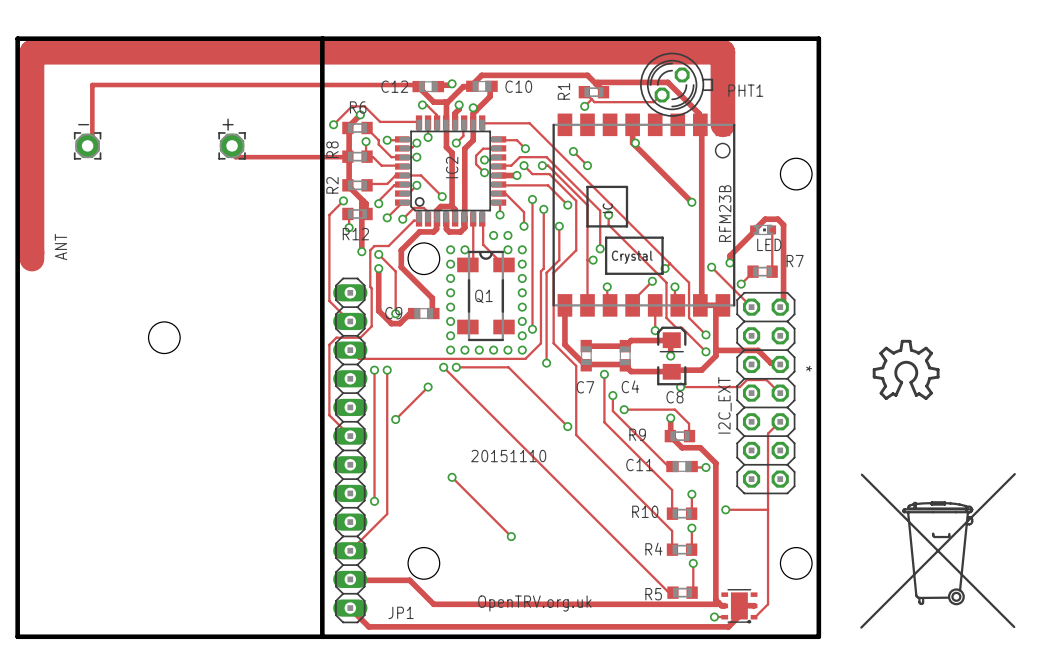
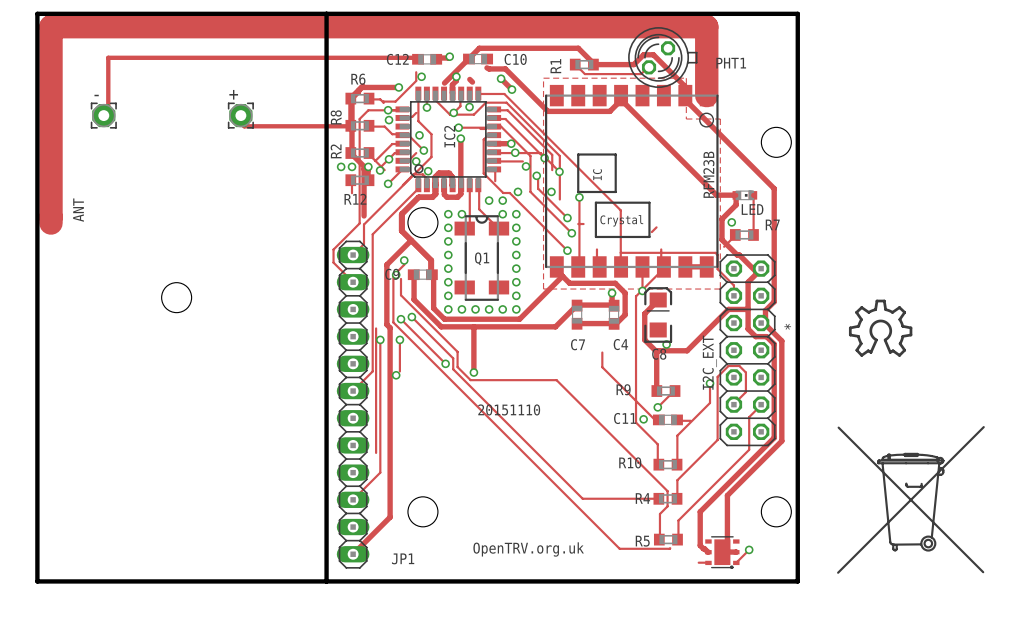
track: (595, 83) (667, 82) (698, 113) (698, 123) (701, 126) (700, 305) -> none
track: (418, 86) (433, 102) (446, 103) -> none
track: (491, 86) (490, 96) (473, 113) (473, 140) (464, 148) (463, 228) -> (460, 138) (460, 194)
track: (603, 92) (587, 75) (481, 75) (472, 86) (463, 86) (446, 103) -> none
track: (591, 99) (584, 106) -> none
track: (446, 103) (446, 147) (452, 152) (452, 206) (454, 209) (455, 219) -> (562, 276) (519, 319) (444, 319) (433, 308) (431, 260) (402, 231) (402, 213) (418, 197) (432, 197) (435, 194) (435, 176) (439, 173) (448, 173) (452, 176) (452, 185)
track: (422, 104) (426, 104) (436, 114) (437, 122) -> (559, 199) (559, 156) (506, 102) (485, 102) (473, 114) (449, 114) (435, 100) (435, 93)
zone outline: none -> (543, 78) (543, 289) (720, 289) (720, 119) (686, 119) (686, 78) (543, 78)
via: (584, 106) -> none
via: (473, 107) -> none
track: none -> (501, 78) (511, 89)
via: none -> (501, 78)
track: none -> (444, 83) (479, 48) (578, 48) (593, 64) (633, 64) (643, 54) (653, 54) (684, 86) (687, 101) (774, 188) (774, 301) (765, 310) (765, 321) (761, 323) (764, 323) (781, 340) (781, 441) (727, 495) (727, 549) (722, 552) (736, 552)
via: (360, 114) -> none
track: none -> (398, 87) (361, 87) (350, 98) (350, 125)
via: none -> (398, 87)
via: none -> (511, 89)
track: (419, 122) (380, 121) (364, 106) (351, 106) (333, 124) -> (418, 93) (418, 121) (431, 134) (431, 157) (364, 224) (364, 244) (353, 255)
track: (482, 122) (529, 123) (689, 282) (689, 317) (705, 334) -> (478, 93) (504, 93) (620, 210) (621, 266)
via: (333, 124) -> none
track: (632, 124) (632, 143) (691, 202) -> none
track: (367, 128) (378, 140) (378, 144) (391, 157) (416, 157) -> (369, 98) (380, 99) (383, 102) (395, 101) (416, 80) (416, 72)
via: none -> (469, 107)
track: (499, 139) (516, 140) (525, 148) -> (494, 109) (507, 110) (552, 154) (552, 170)
track: (366, 141) (367, 157) (373, 157) (381, 165) (402, 166) -> none
via: (366, 141) -> none
via: (416, 143) -> none
via: (635, 143) -> none
track: (499, 148) (483, 148) (476, 155) (476, 164) (484, 172) -> (494, 117) (505, 119) (544, 158)
via: (525, 148) -> none
via: none -> (389, 120)
track: (573, 151) (587, 165) -> none
via: (573, 151) -> none
track: none -> (369, 125) (384, 126) (392, 134) (408, 135) (423, 150)
via: (416, 157) -> none
track: none -> (458, 127) (501, 126) (530, 156) (530, 191) (571, 233)
via: none -> (458, 127)
via: (484, 159) -> none
track: (524, 165) (532, 174) (549, 174) (576, 200) (576, 250) (553, 272) (553, 343) (576, 365) (576, 435) (672, 530) (672, 549) -> (411, 317) (453, 358) (453, 369) (582, 498) (658, 498)
via: (524, 165) -> none
track: (542, 165) (548, 165) (587, 205) (587, 305) -> (579, 197) (578, 266)
via: (542, 165) -> none
via: (587, 165) -> none
via: none -> (419, 135)
track: none -> (488, 135) (483, 139) (483, 173) (503, 193) (509, 193) (567, 250)
track: (499, 166) (511, 165) (519, 157) (546, 157) (600, 210) (600, 248) -> none
via: none -> (460, 138)
via: (484, 172) -> none
track: none -> (402, 143) (392, 144) (375, 160)
via: none -> (423, 150)
track: (367, 185) (387, 183) (395, 175) (421, 175) (442, 196) -> (369, 153) (384, 170)
via: (416, 185) -> none
via: none -> (515, 152)
via: none -> (544, 158)
via: none -> (389, 159)
track: (499, 193) (505, 193) (524, 212) (524, 226) -> (494, 160) (522, 161)
via: none -> (416, 161)
via: (442, 196) -> none
via: none -> (341, 166)
via: none -> (352, 166)
via: none -> (368, 166)
track: (532, 199) (532, 329) -> none
track: (343, 200) (329, 215) (329, 301) (350, 321) -> (402, 109) (368, 110) (359, 119) (359, 223) (333, 249) (333, 262) (353, 282)
via: (343, 200) -> none
via: (691, 202) -> none
via: none -> (428, 171)
track: (543, 209) (543, 268) (540, 271) (540, 343) (525, 358) (359, 358) (350, 350) -> none
track: none -> (538, 176) (538, 188) (567, 218)
via: (500, 215) -> none
track: (608, 215) (608, 224) (666, 282) (666, 317) (676, 327) (682, 327) (705, 351) -> none
via: (608, 215) -> none
via: (402, 219) -> none
track: (419, 219) (414, 220) (388, 246) (374, 246) (370, 250) (371, 326) (360, 337) (336, 337) (329, 344) (329, 415) (350, 436) -> (418, 185) (417, 189) (372, 234) (372, 371) (353, 391)
track: (559, 226) (559, 260) (546, 272) (546, 363) -> none
via: (349, 227) -> none
via: none -> (579, 197)
via: (600, 248) -> none
via: (361, 251) -> none
via: none -> (567, 218)
track: (378, 254) (395, 271) (395, 313) -> none
via: (378, 254) -> none
via: none -> (731, 222)
via: (593, 260) -> none
track: (729, 262) (729, 255) (765, 219) (777, 219) (783, 224) (783, 303) (780, 307) -> none
via: (729, 262) -> none
track: (711, 267) (751, 307) -> none
via: (711, 267) -> none
track: (378, 268) (378, 310) (391, 323) (399, 323) (409, 313) (414, 313) -> (612, 293) (612, 302) (614, 305) (577, 305) (555, 326) (441, 326) (414, 299) (413, 274)
via: (378, 268) -> none
via: (665, 268) -> none
via: none -> (571, 233)
track: (652, 281) (632, 301) (632, 305) -> none
via: (652, 281) -> none
via: (741, 284) -> none
via: (607, 286) -> none
via: (674, 286) -> none
via: none -> (567, 250)
track: none -> (620, 252) (715, 252) (717, 255) (717, 269) (733, 285) (733, 295)
track: none -> (404, 260) (404, 264) (393, 275) (393, 322) (619, 548) (670, 548)
via: none -> (404, 260)
track: (564, 305) (564, 344) (584, 364) (624, 364) (631, 371) (671, 371) (673, 370) (701, 370) (715, 356) (715, 306) (722, 305) -> (556, 266) (557, 271) (569, 283) (615, 283) (625, 293) (625, 314) (616, 323) (577, 323)
via: (532, 329) -> none
via: none -> (612, 293)
via: (705, 334) -> none
track: none -> (658, 299) (644, 313) (644, 339) (656, 351)
track: (586, 346) (625, 346) (631, 340) (671, 340) (670, 356) -> none
track: (715, 350) (758, 350) (770, 363) (780, 364) -> none
track: none -> (748, 309) (728, 309) (687, 350) (656, 351)
via: (705, 351) -> none
via: (670, 356) -> none
via: none -> (411, 317)
track: none -> (400, 319) (445, 363)
via: none -> (400, 319)
via: (546, 363) -> none
track: (443, 367) (667, 591) (672, 592) -> (400, 278) (400, 295) (457, 351) (457, 367) (470, 380) (556, 380) (667, 491) (667, 506) (659, 513) (659, 539)
via: (443, 367) -> none
track: (456, 367) (508, 367) (567, 426) -> none
via: (456, 367) -> none
track: none -> (473, 326) (473, 372)
via: (374, 370) -> none
track: (387, 370) (387, 514) (350, 550) -> (380, 339) (380, 472) (353, 499)
via: (387, 370) -> none
track: (604, 374) (604, 422) (672, 490) (672, 513) -> (663, 266) (636, 296) (636, 422) (657, 444) (658, 464)
via: (604, 374) -> none
via: none -> (380, 339)
track: none -> (399, 339) (399, 371)
via: none -> (399, 339)
track: (428, 387) (395, 419) -> none
via: (428, 387) -> none
track: (680, 387) (739, 387) (746, 380) (766, 380) (780, 393) -> none
track: none -> (656, 351) (656, 391)
via: (612, 395) -> none
via: none -> (445, 363)
track: (624, 409) (674, 409) (689, 423) (689, 436) -> (657, 407) (675, 391)
via: (624, 409) -> none
via: none -> (473, 372)
track: (670, 418) (670, 436) (682, 447) (700, 447) (715, 463) (715, 600) (721, 605) (724, 605) -> (486, 67) (505, 68) (547, 111) (609, 111) (619, 101) (621, 95) (621, 100) (716, 195) (736, 195) (736, 204) (721, 219) (721, 239) (755, 271) (761, 268) (748, 282) (748, 329) (755, 336) (766, 336) (774, 344) (774, 437) (700, 511) (700, 545) (708, 552)
via: (670, 418) -> none
track: (780, 421) (768, 433) (768, 604) (754, 617) -> (749, 549) (736, 562)
via: (567, 426) -> none
via: none -> (710, 383)
via: none -> (657, 407)
via: none -> (643, 419)
via: (705, 467) -> none
track: (452, 477) (511, 536) -> none
via: (452, 477) -> none
track: (691, 494) (691, 513) -> (710, 383) (710, 403) (677, 435) (677, 464)
via: (691, 494) -> none
via: (374, 501) -> none
track: (725, 509) (768, 509) -> none
via: (725, 509) -> none
track: (691, 528) (691, 549) -> (733, 404) (745, 392) (745, 372) (739, 366) (728, 366) (717, 376) (717, 439) (677, 480) (677, 498)
via: (691, 528) -> none
via: (511, 536) -> none
track: (693, 563) (692, 592) -> (761, 404) (749, 417) (749, 449) (678, 520) (677, 539)
via: (693, 563) -> none
track: (350, 579) (409, 580) (433, 604) (718, 602) -> none
via: none -> (749, 549)
track: (754, 605) (739, 605) (738, 616) (728, 626) (368, 626) (350, 608) -> (411, 240) (386, 264) (386, 324) (390, 327) (390, 517) (353, 554)
via: (714, 616) -> none

